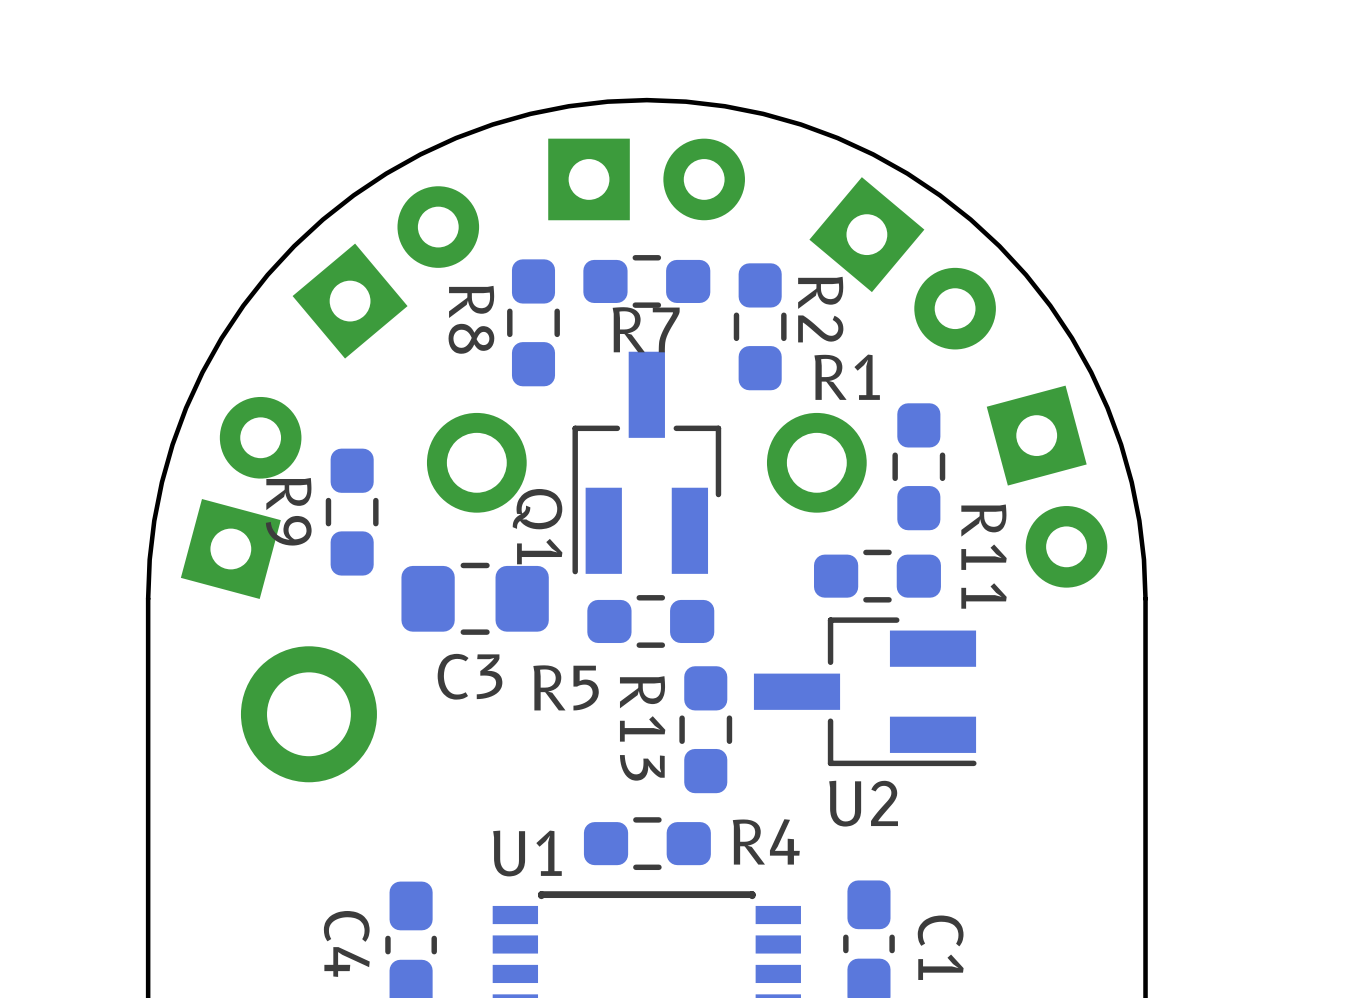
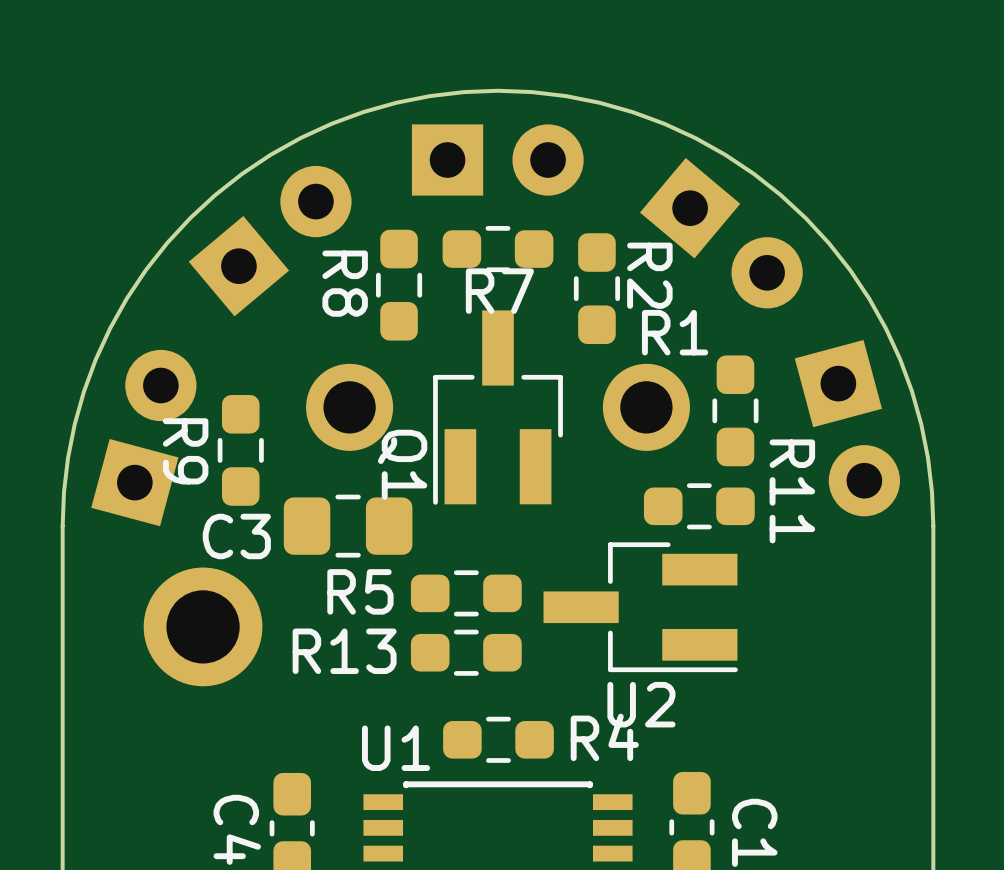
R5 position: (650, 621) -> (466, 593)
C3 name position: C3 (470, 676) -> C3 (236, 536)
R5 name position: R5 (566, 687) -> R5 (360, 591)
U2 position: (865, 691) -> (640, 607)
R13 rotation: 0° (705, 729) -> 90° clockwise (466, 652)
R13 position: (705, 729) -> (466, 652)

